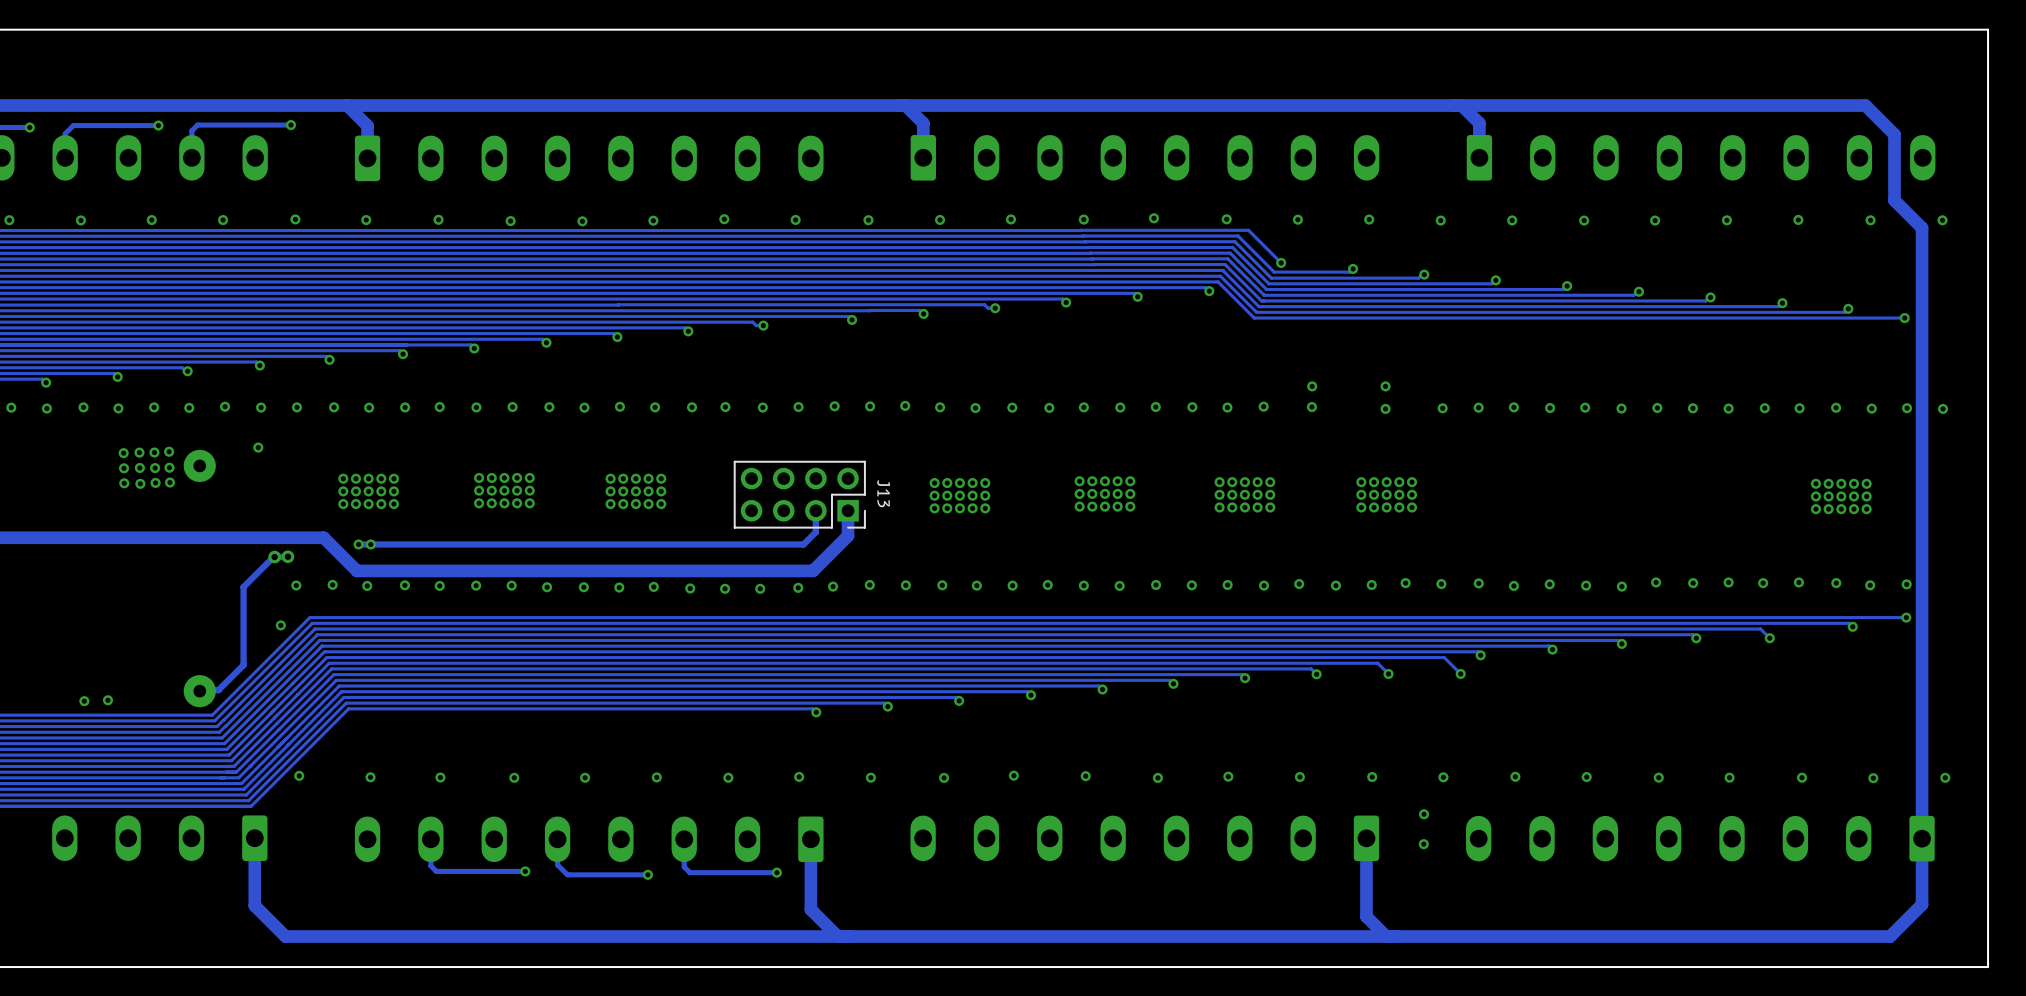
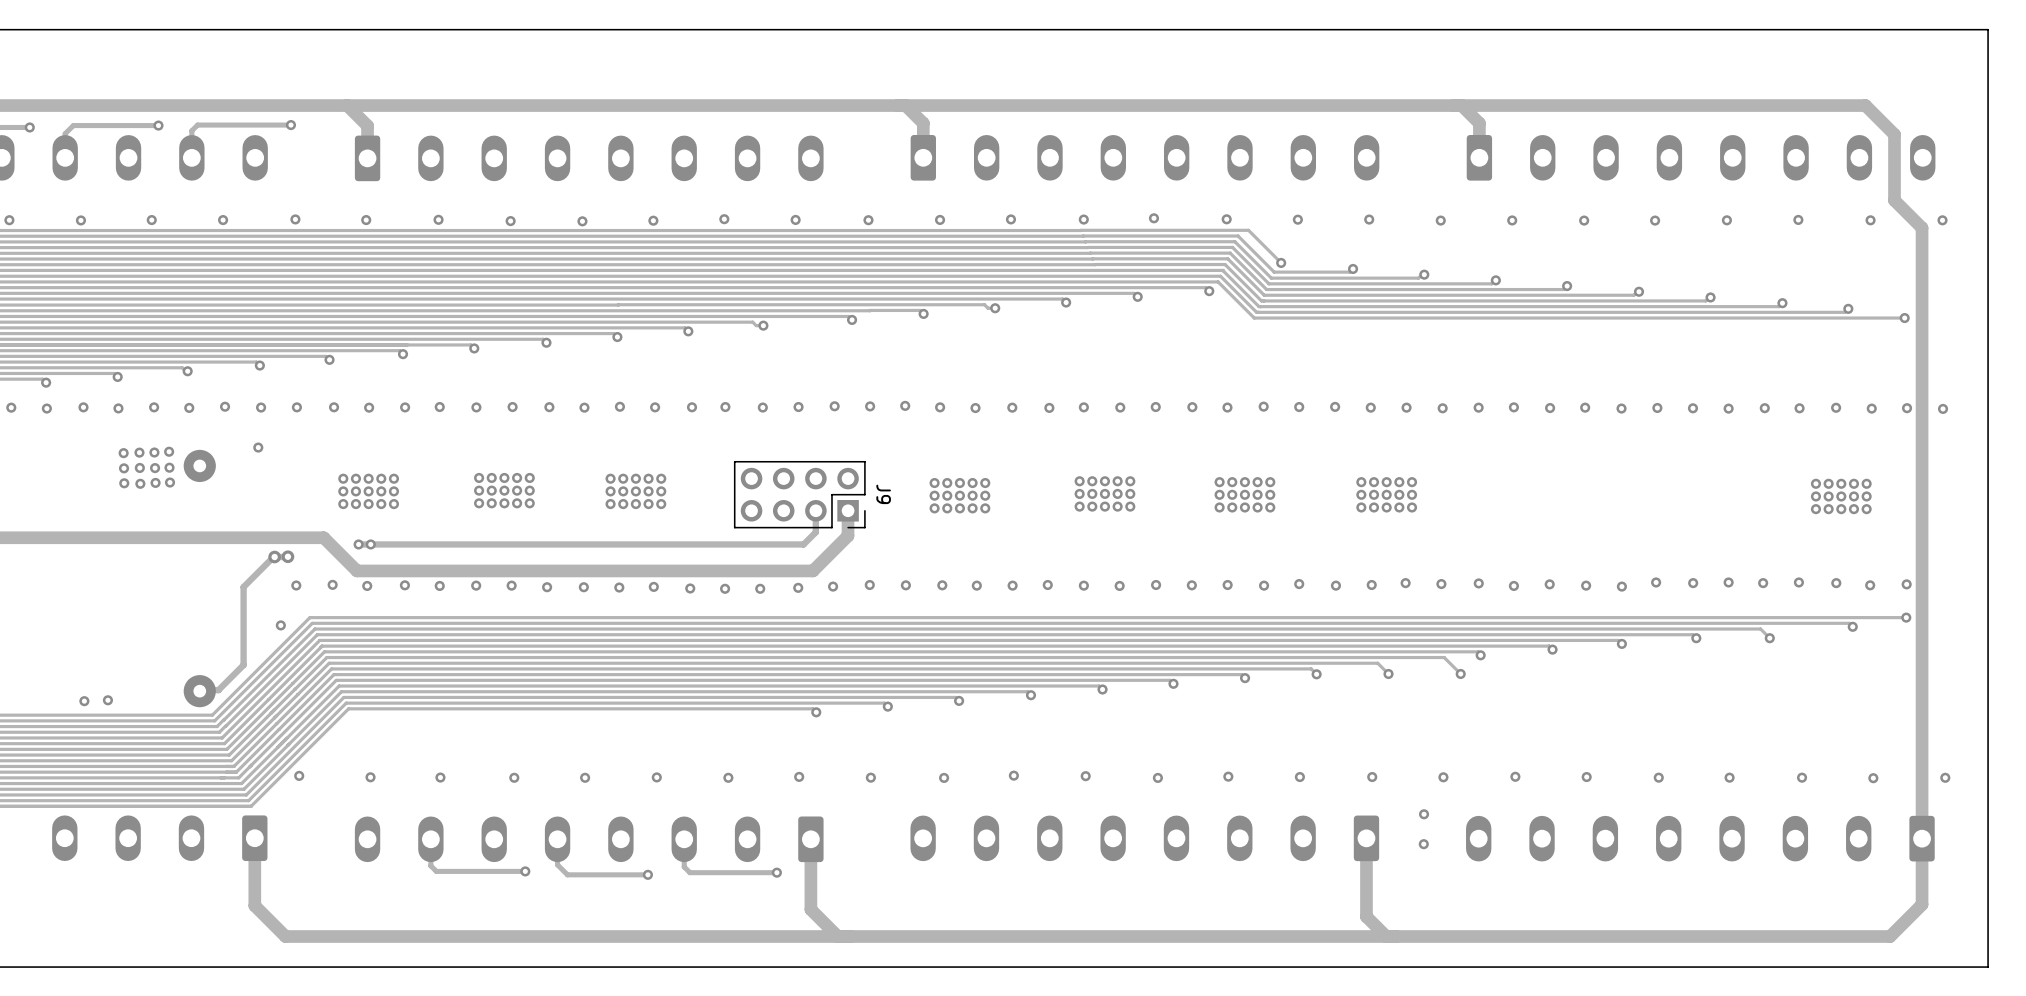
via: (1312, 386) -> none
via: (1385, 386) -> none
via: none -> (1335, 406)
via: none -> (1299, 407)
via: (1311, 407) -> none
via: none -> (1370, 407)
via: none -> (1406, 407)
via: (1385, 408) -> none
J13 name: J13 (883, 493) -> J9 (883, 494)

